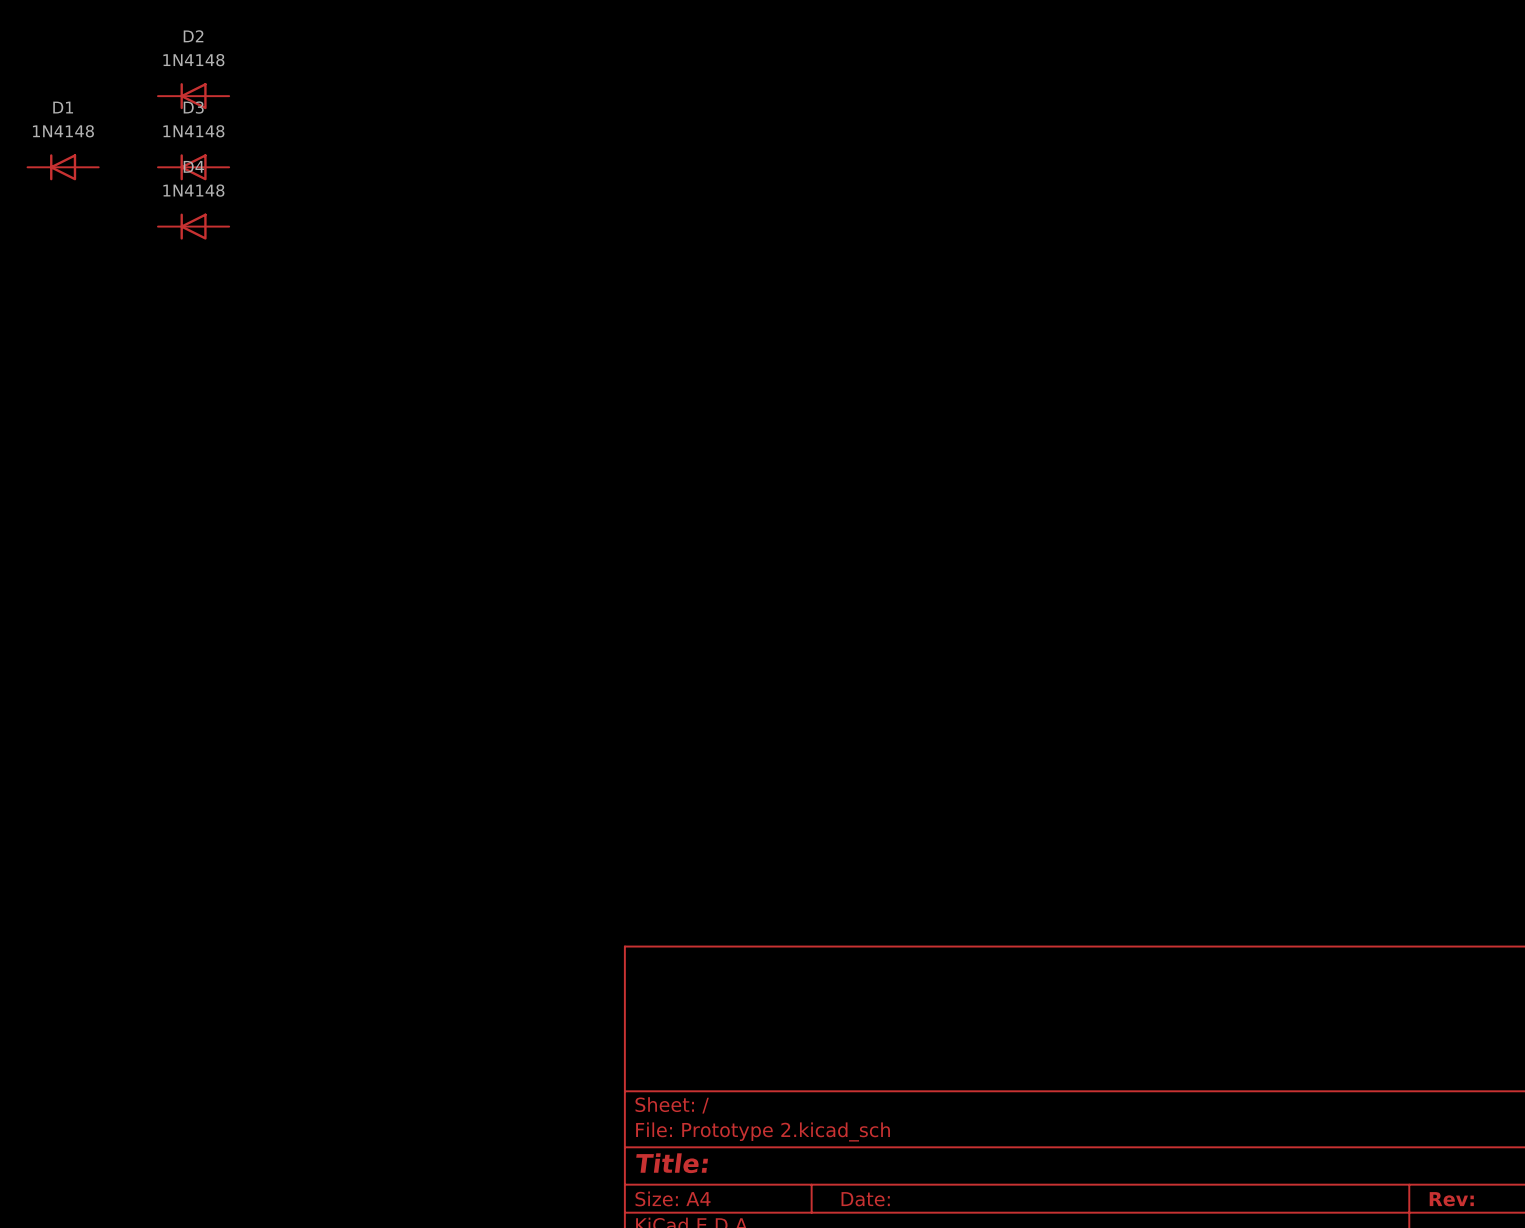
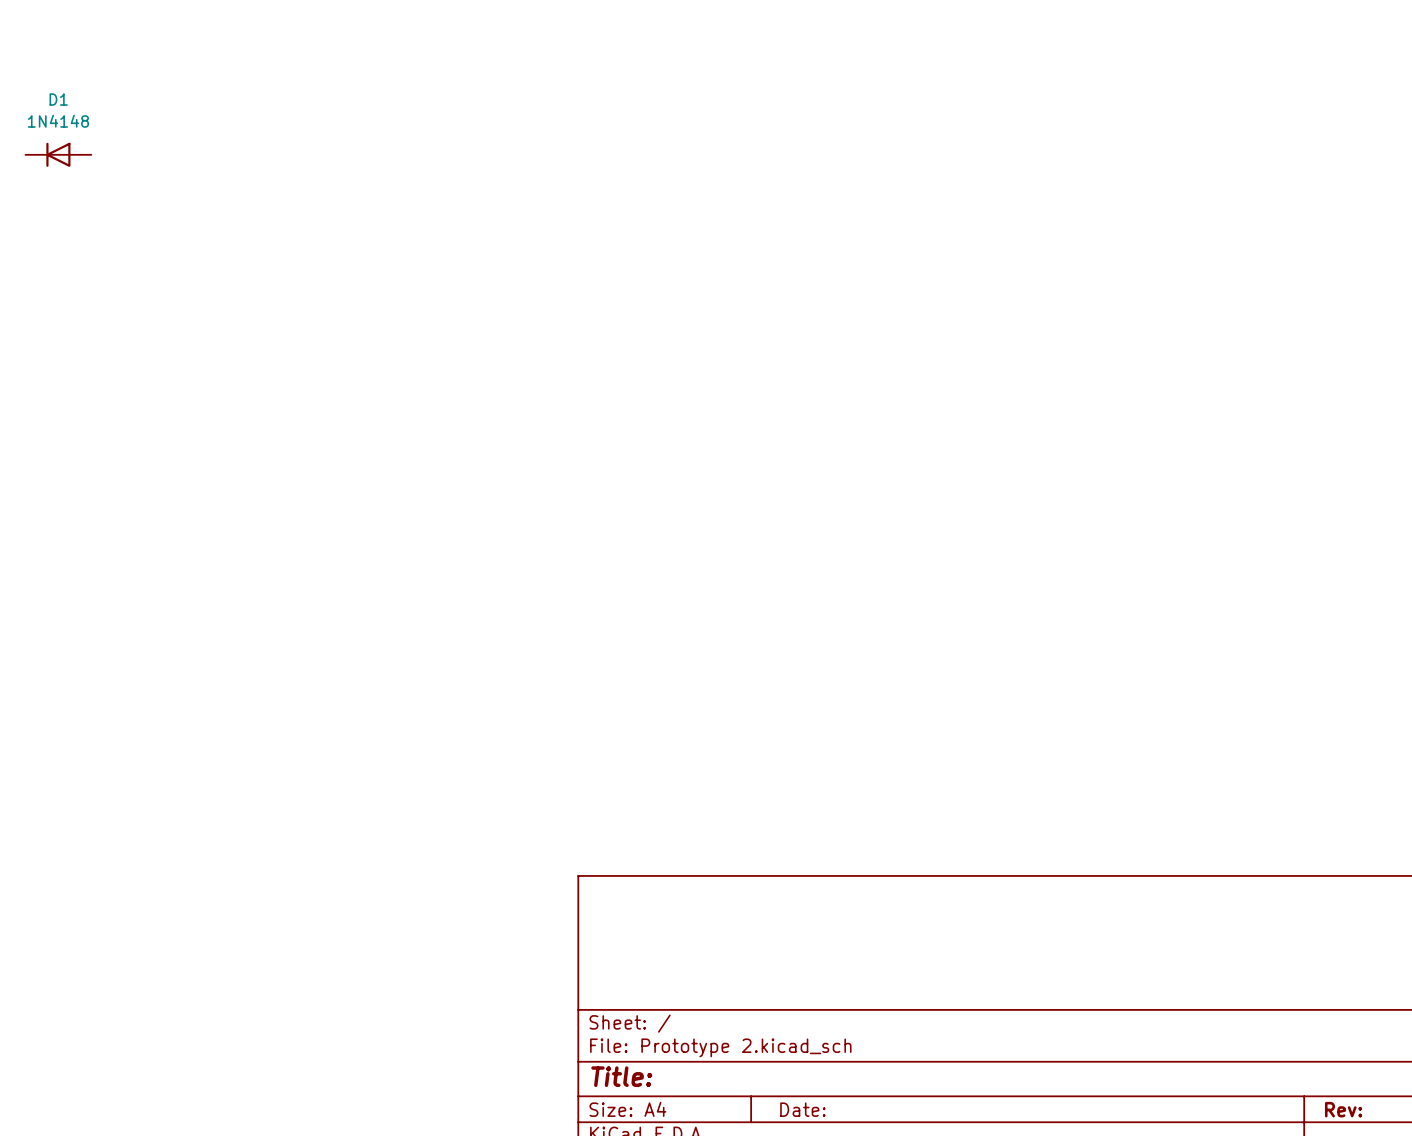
D2: 1N4148 (193, 96) -> none
D3: 1N4148 (193, 167) -> none
D4: 1N4148 (193, 226) -> none

